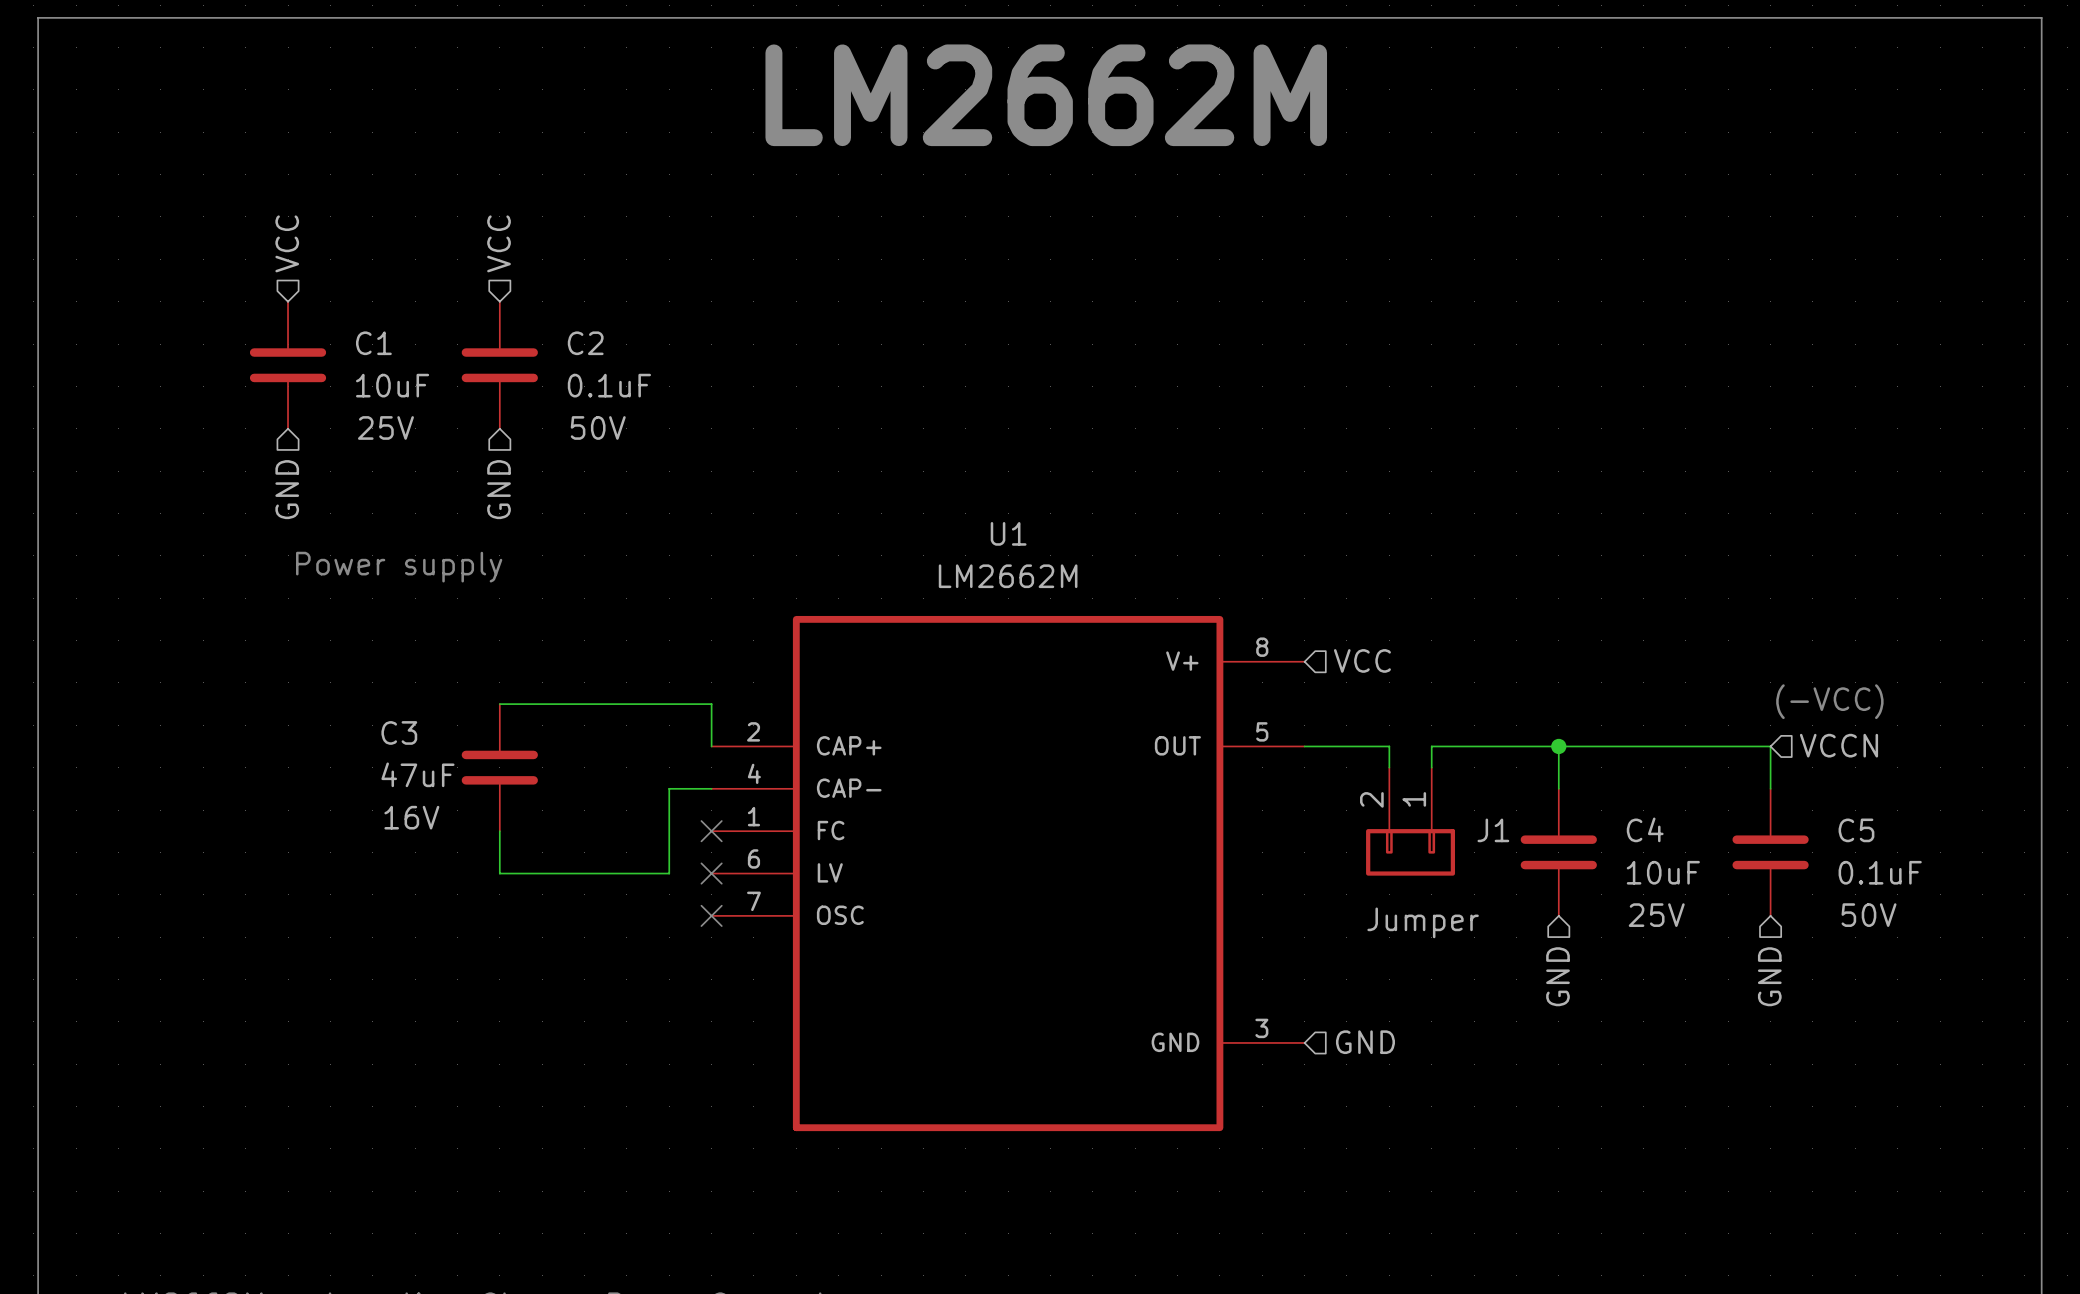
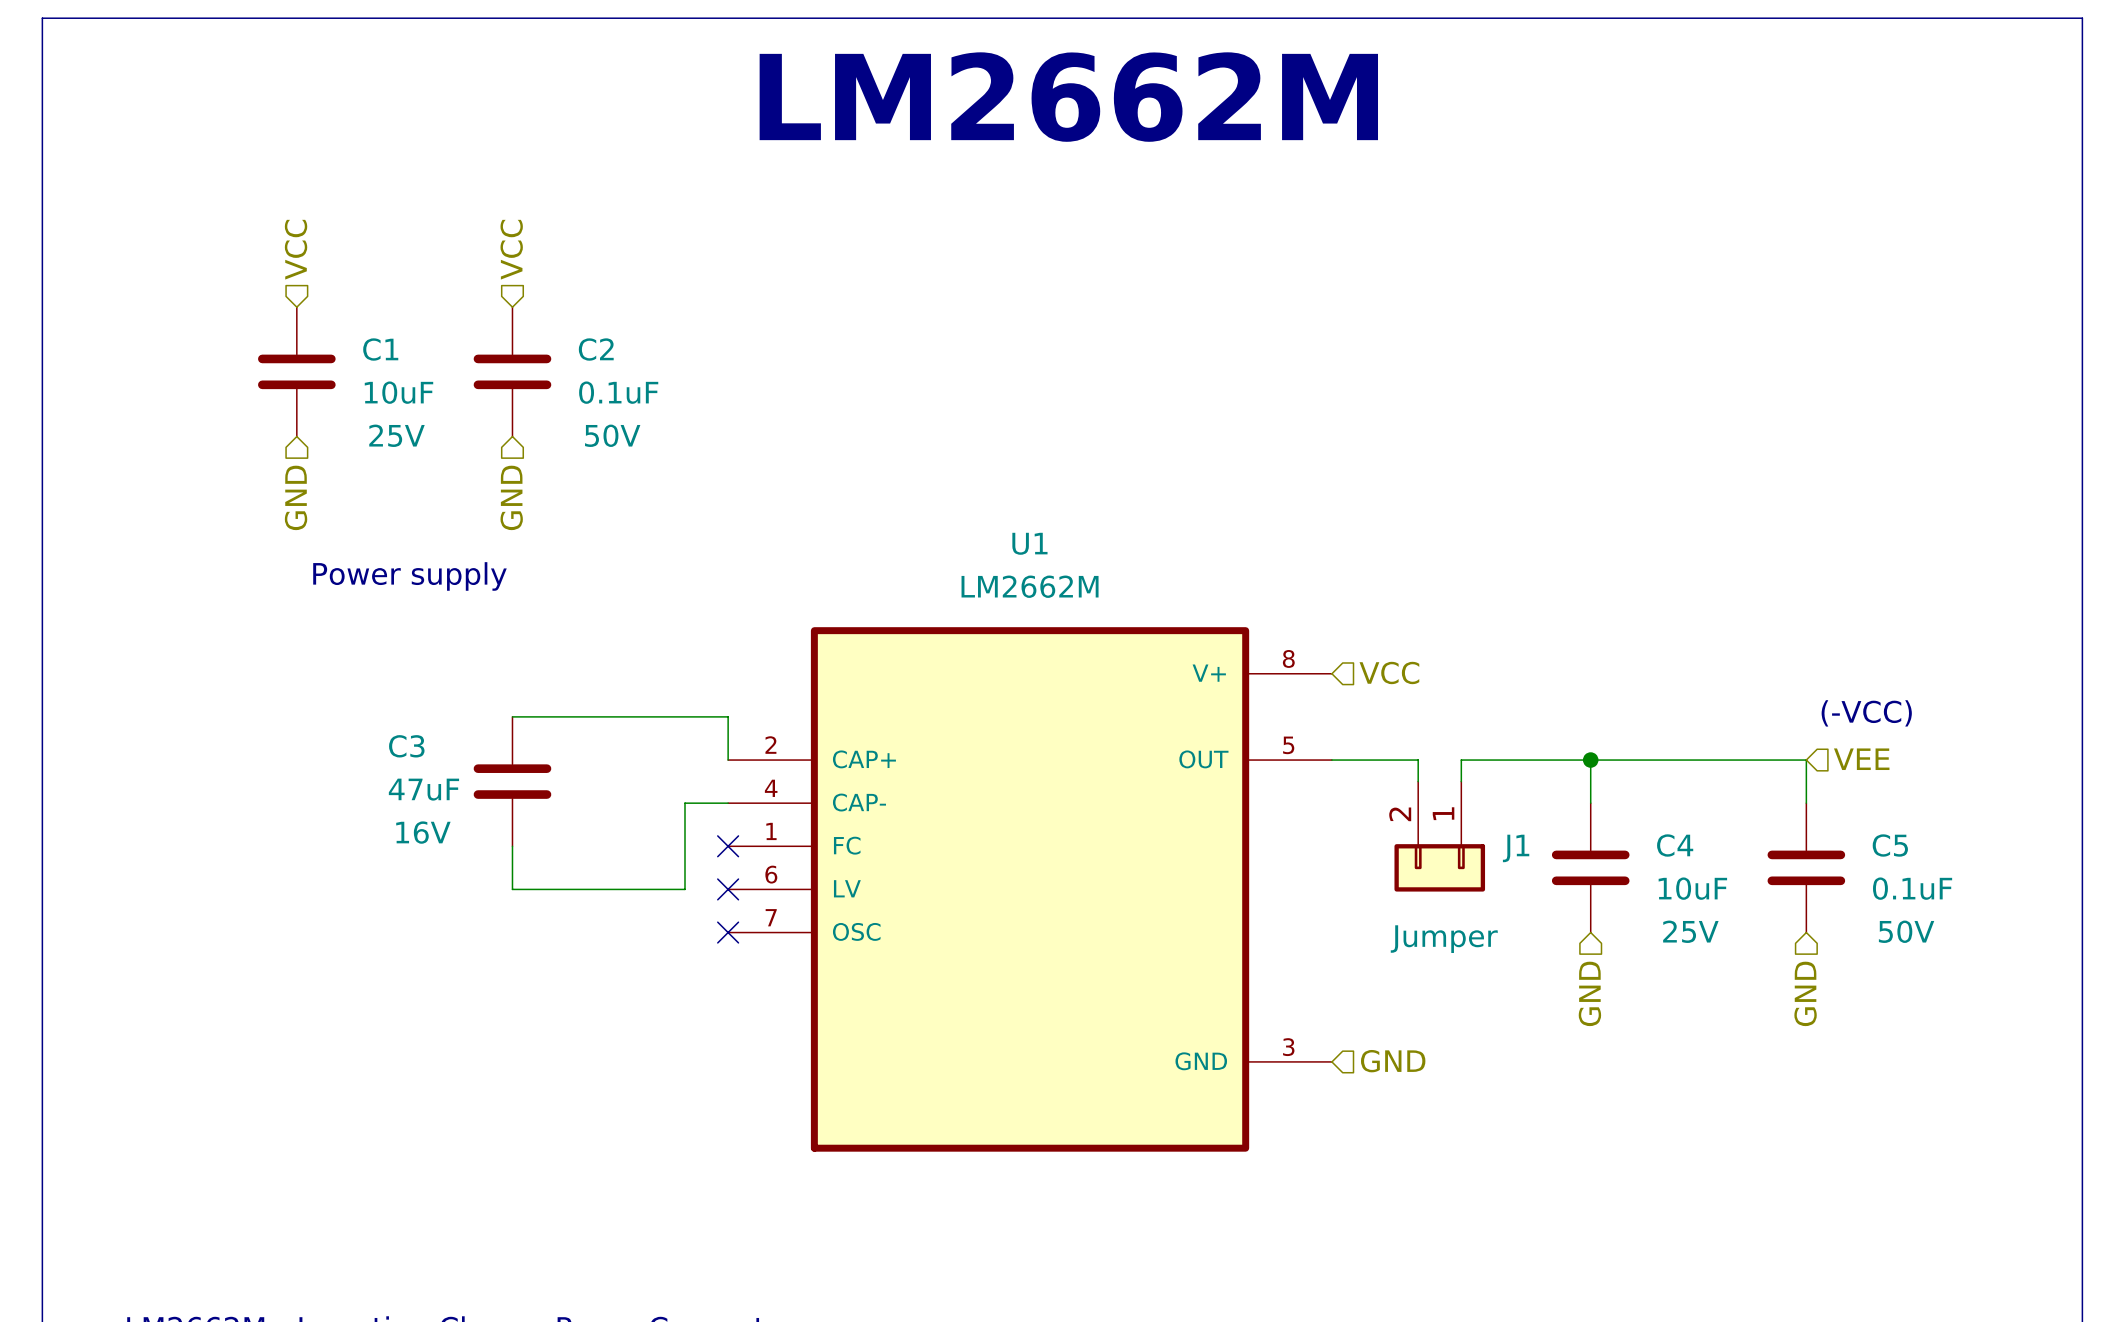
hierarchical label: VCCN (1838, 745) -> VEE (1861, 759)

